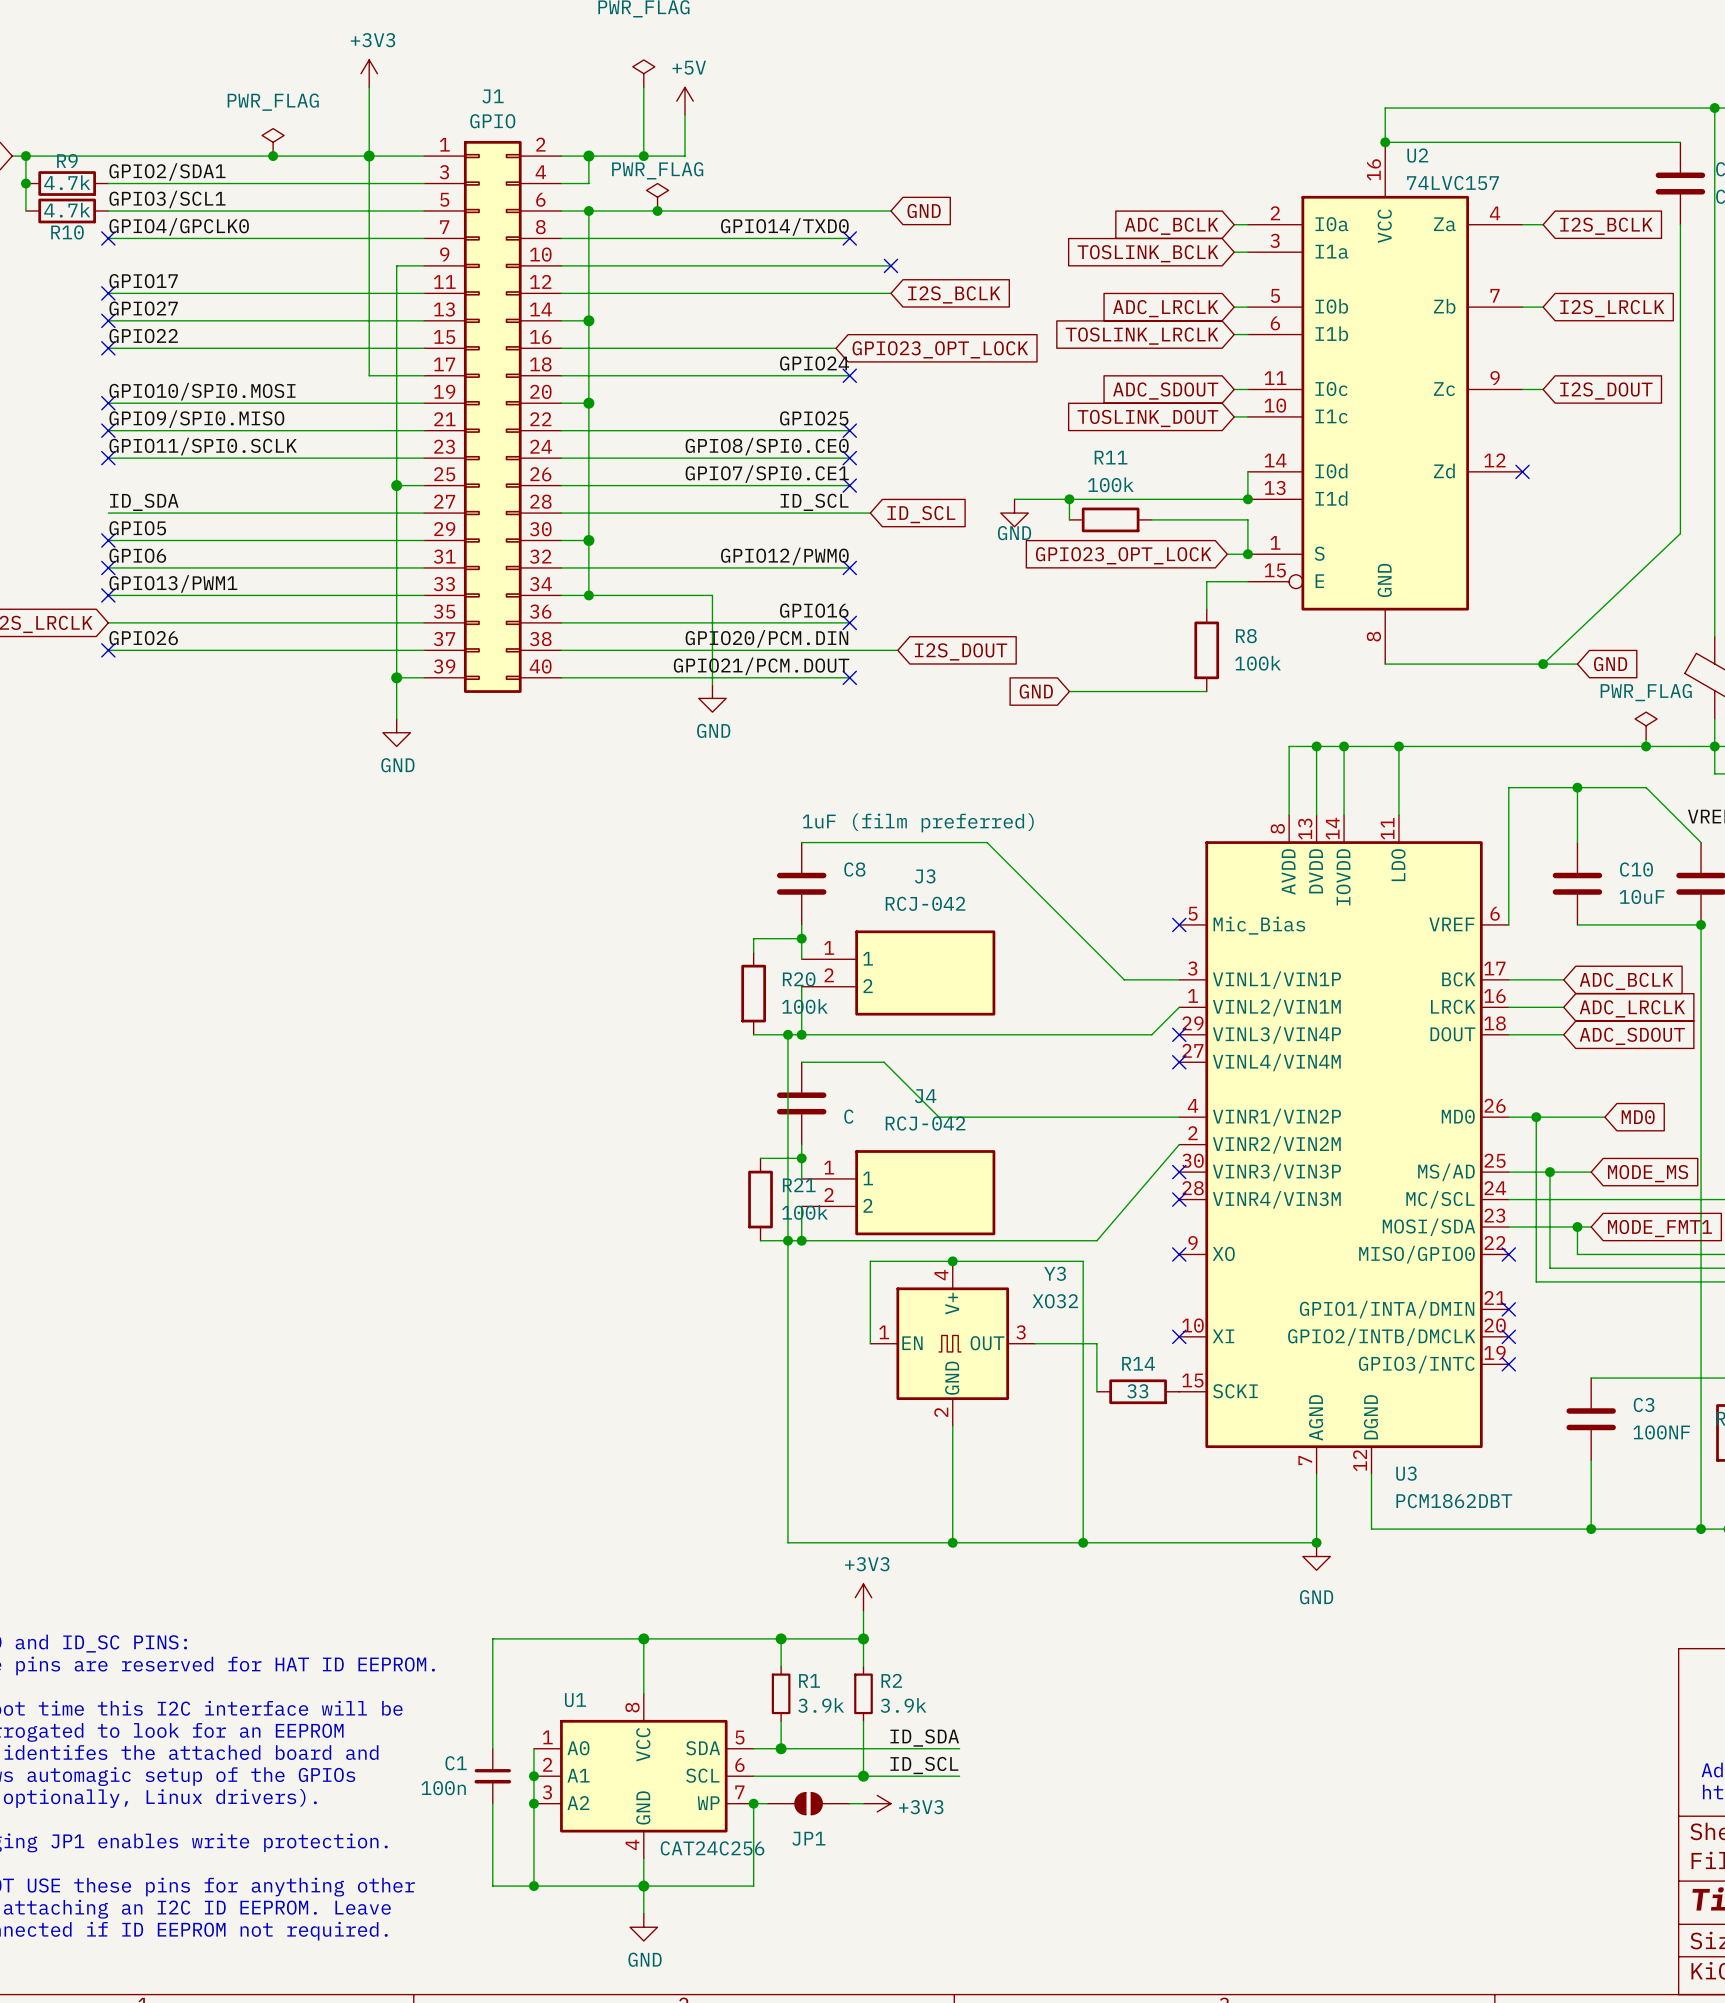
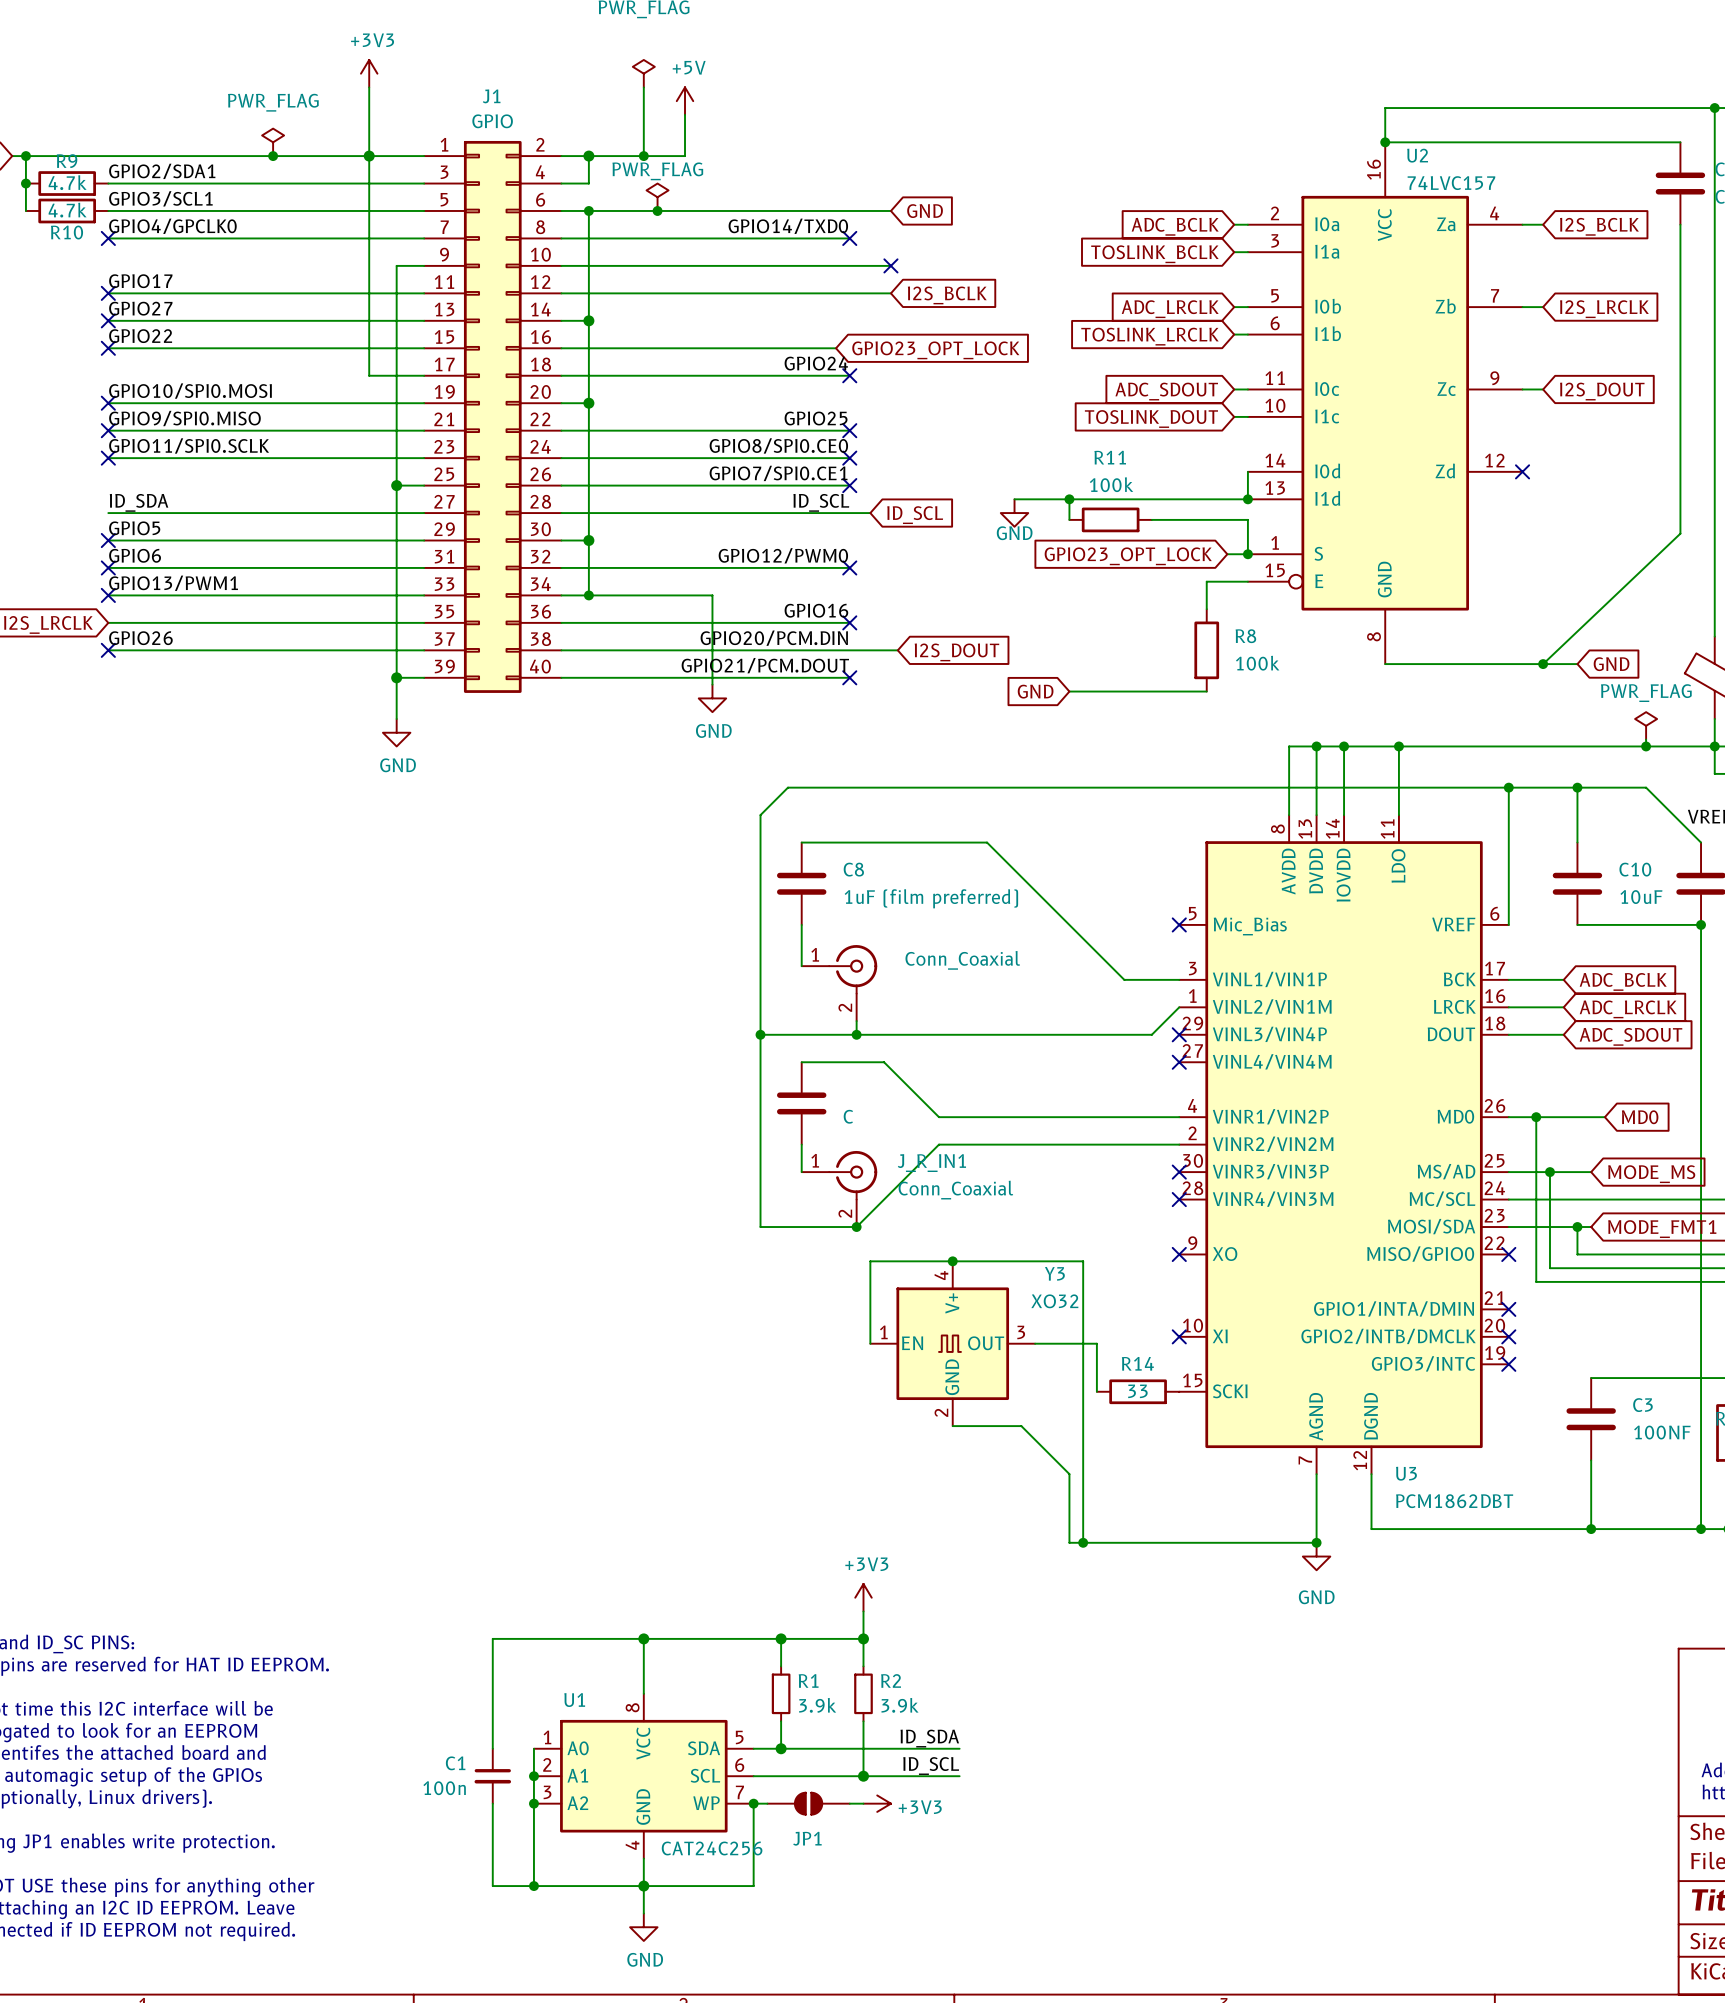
junction: none -> (1508, 787)
C8 value position: 1uF (film preferred) (918, 822) -> 1uF (film preferred) (931, 898)
wire: (801, 938) (753, 938) (753, 952) -> none
junction: (801, 938) -> none
J3: RCJ-042 (898, 973) -> none
part: none -> Conn_Coaxial (839, 983)
wire: (801, 986) (801, 1034) -> none
R20: 100k (753, 993) -> none
wire: none -> (856, 1021) (856, 1034)
junction: none -> (760, 1034)
wire: (787, 1034) (787, 1542) (1069, 1542) -> none
junction: (787, 1034) -> none
junction: (801, 1034) -> none
junction: none -> (856, 1034)
wire: (1179, 1144) (1096, 1240) (760, 1240) -> (1179, 1144) (939, 1144) (856, 1227) (760, 1227) (760, 815) (787, 787) (1508, 787)
wire: (760, 1158) (801, 1158) -> none
junction: (801, 1158) -> none
wire: (801, 1172) (801, 1178) -> (801, 959) (801, 966)
J_R_IN1: none -> Conn_Coaxial (839, 1188)
J4: RCJ-042 (898, 1192) -> none
R21: 100k (760, 1199) -> none
wire: (801, 1206) (801, 1240) -> none
junction: none -> (856, 1227)
junction: (787, 1240) -> none
junction: (801, 1240) -> none
wire: (952, 1426) (952, 1542) -> (952, 1426) (1021, 1426) (1069, 1474) (1069, 1542)
junction: (952, 1542) -> none

